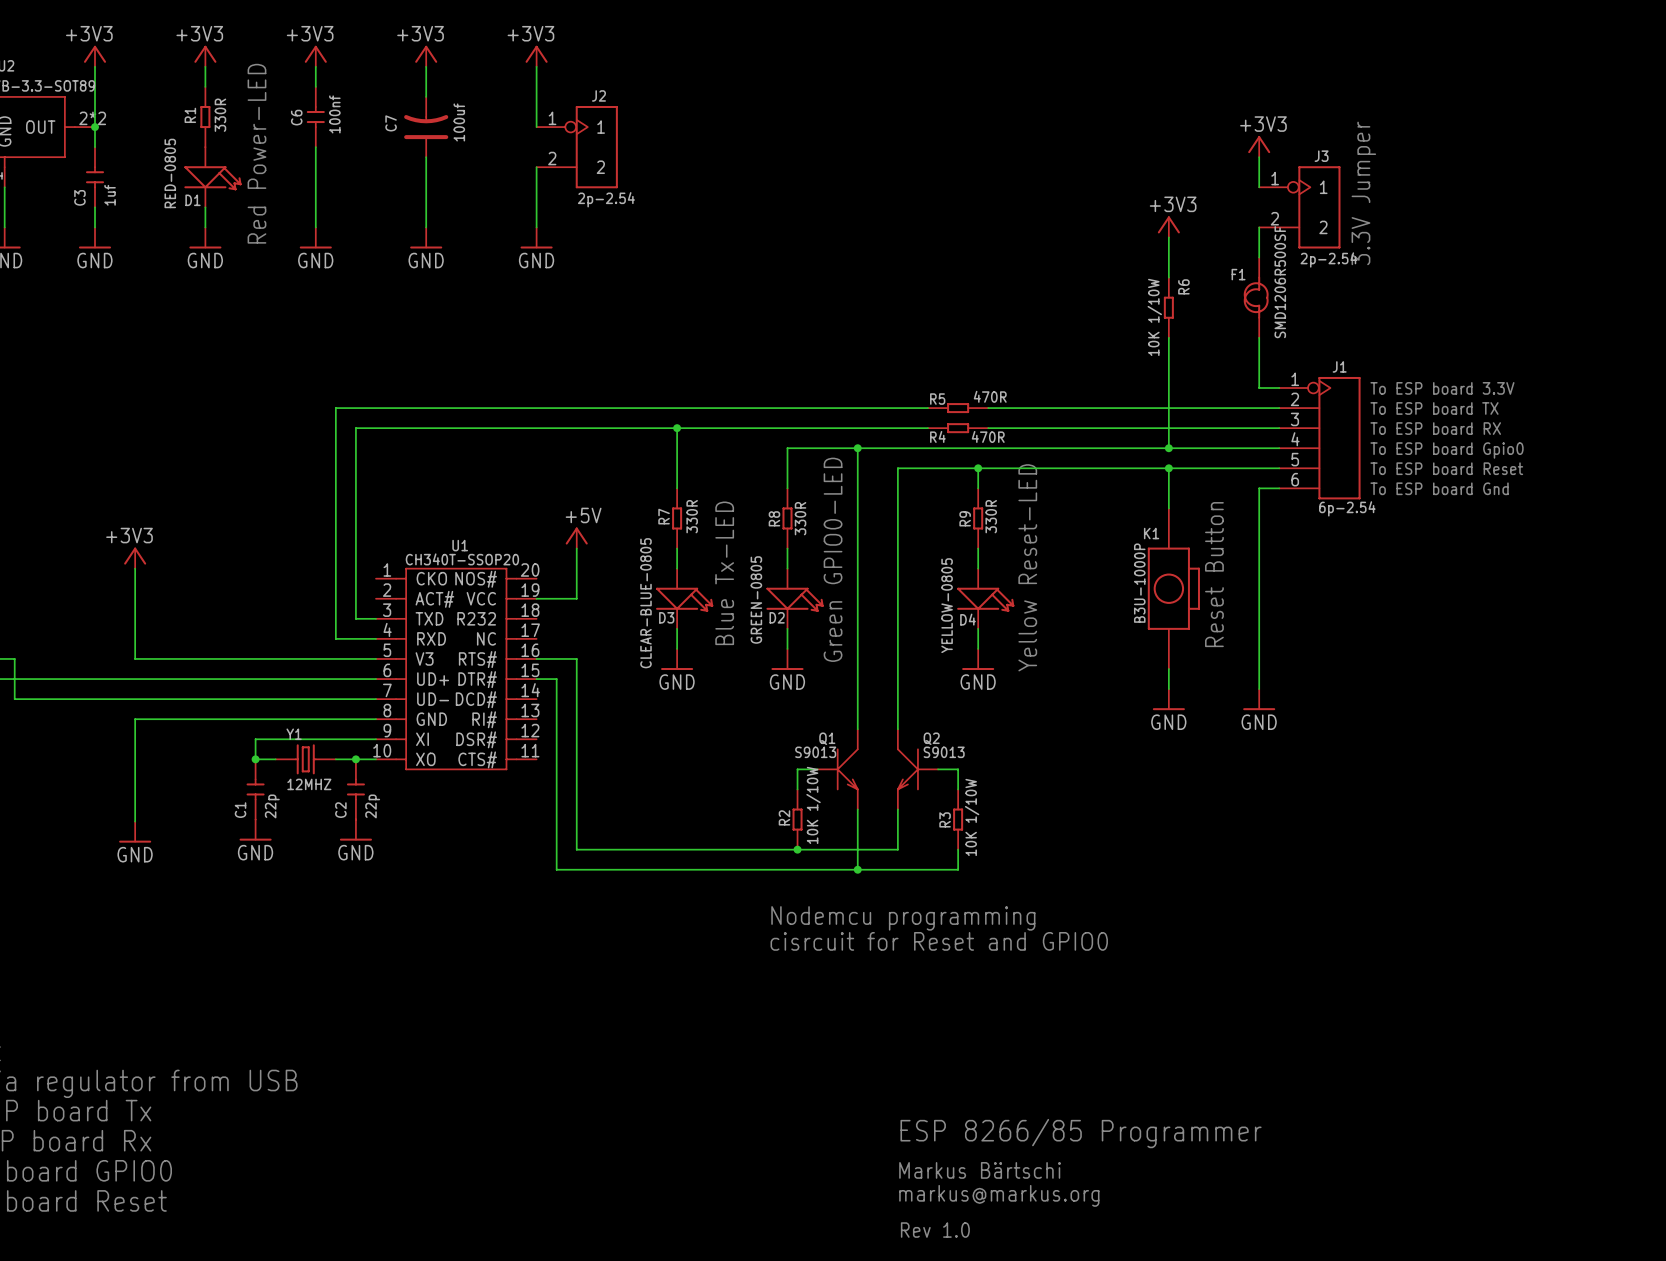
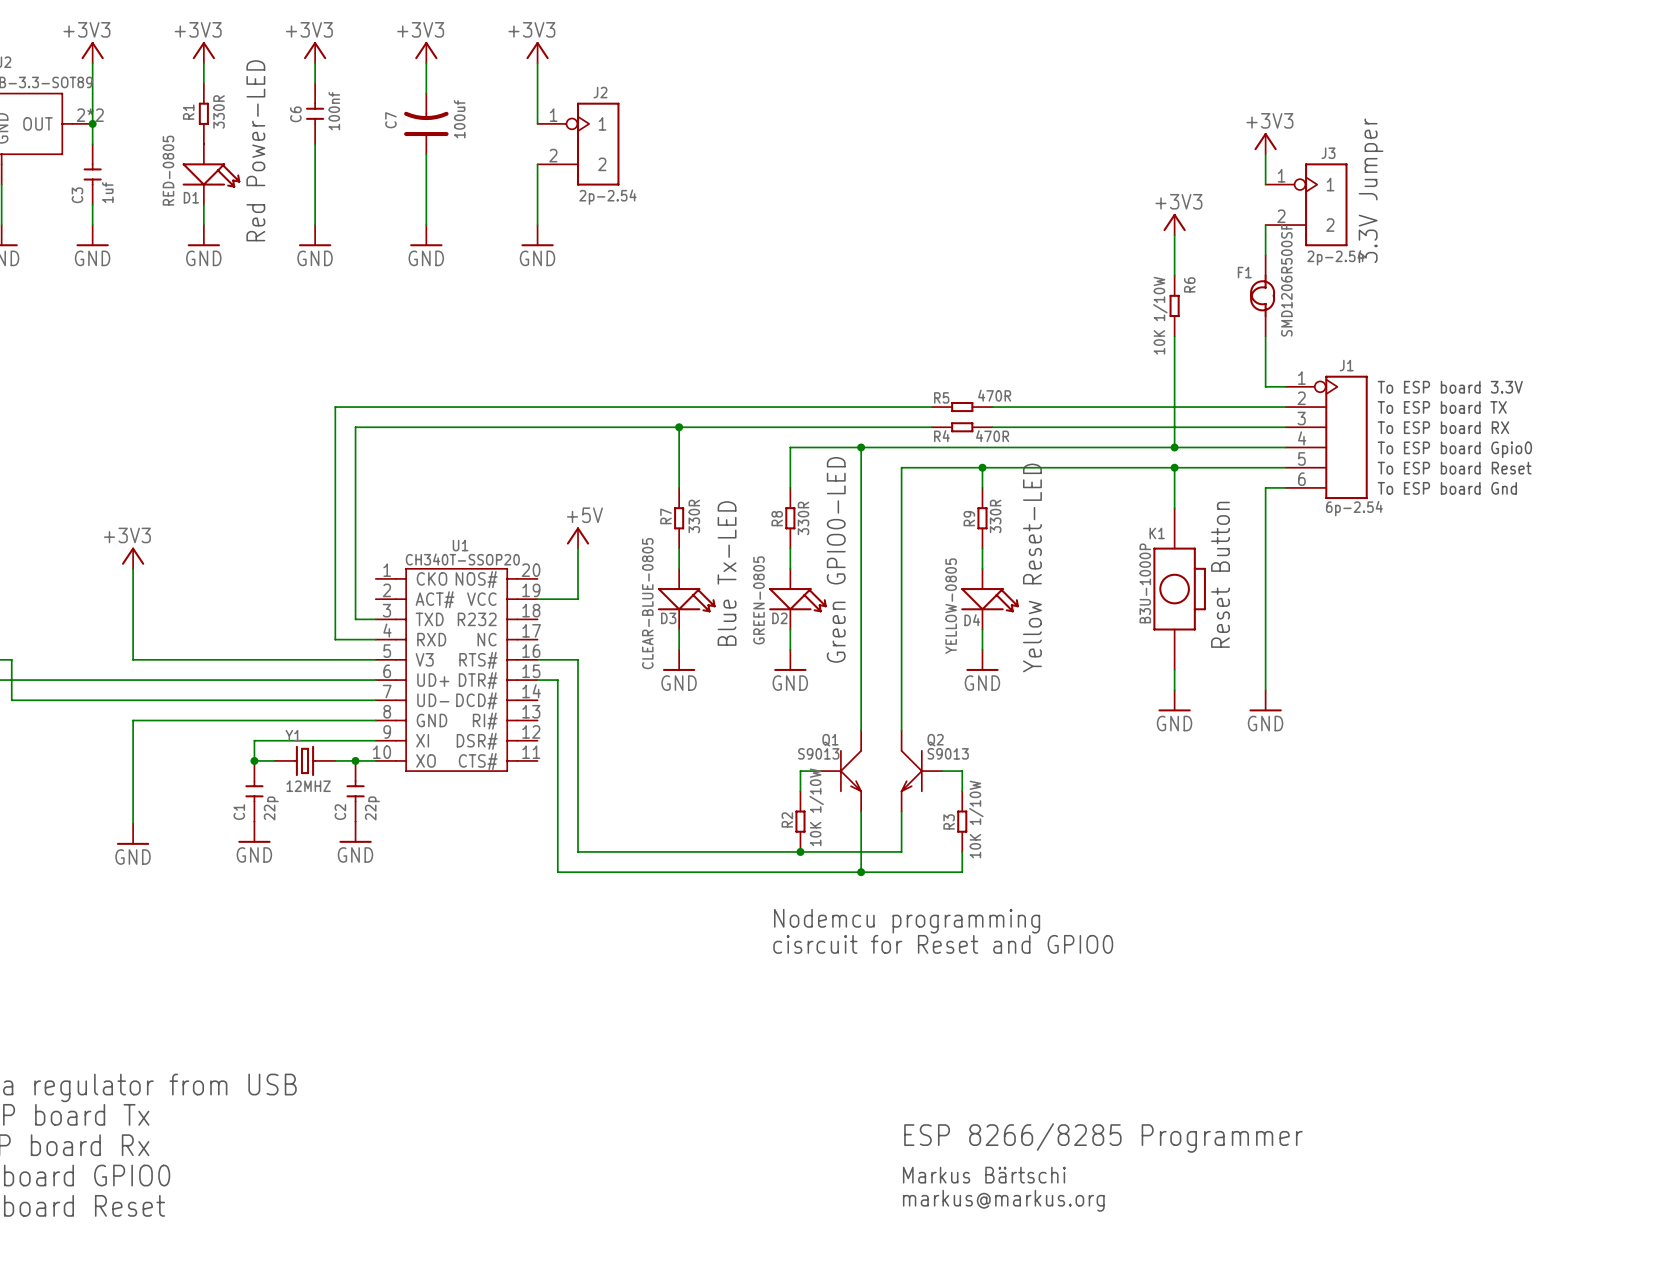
text: ESP 8266/85 Programmer (1081, 1133) -> ESP 8266/8285 Programmer (1103, 1137)
text: Rev 1.0 (935, 1230) -> none

